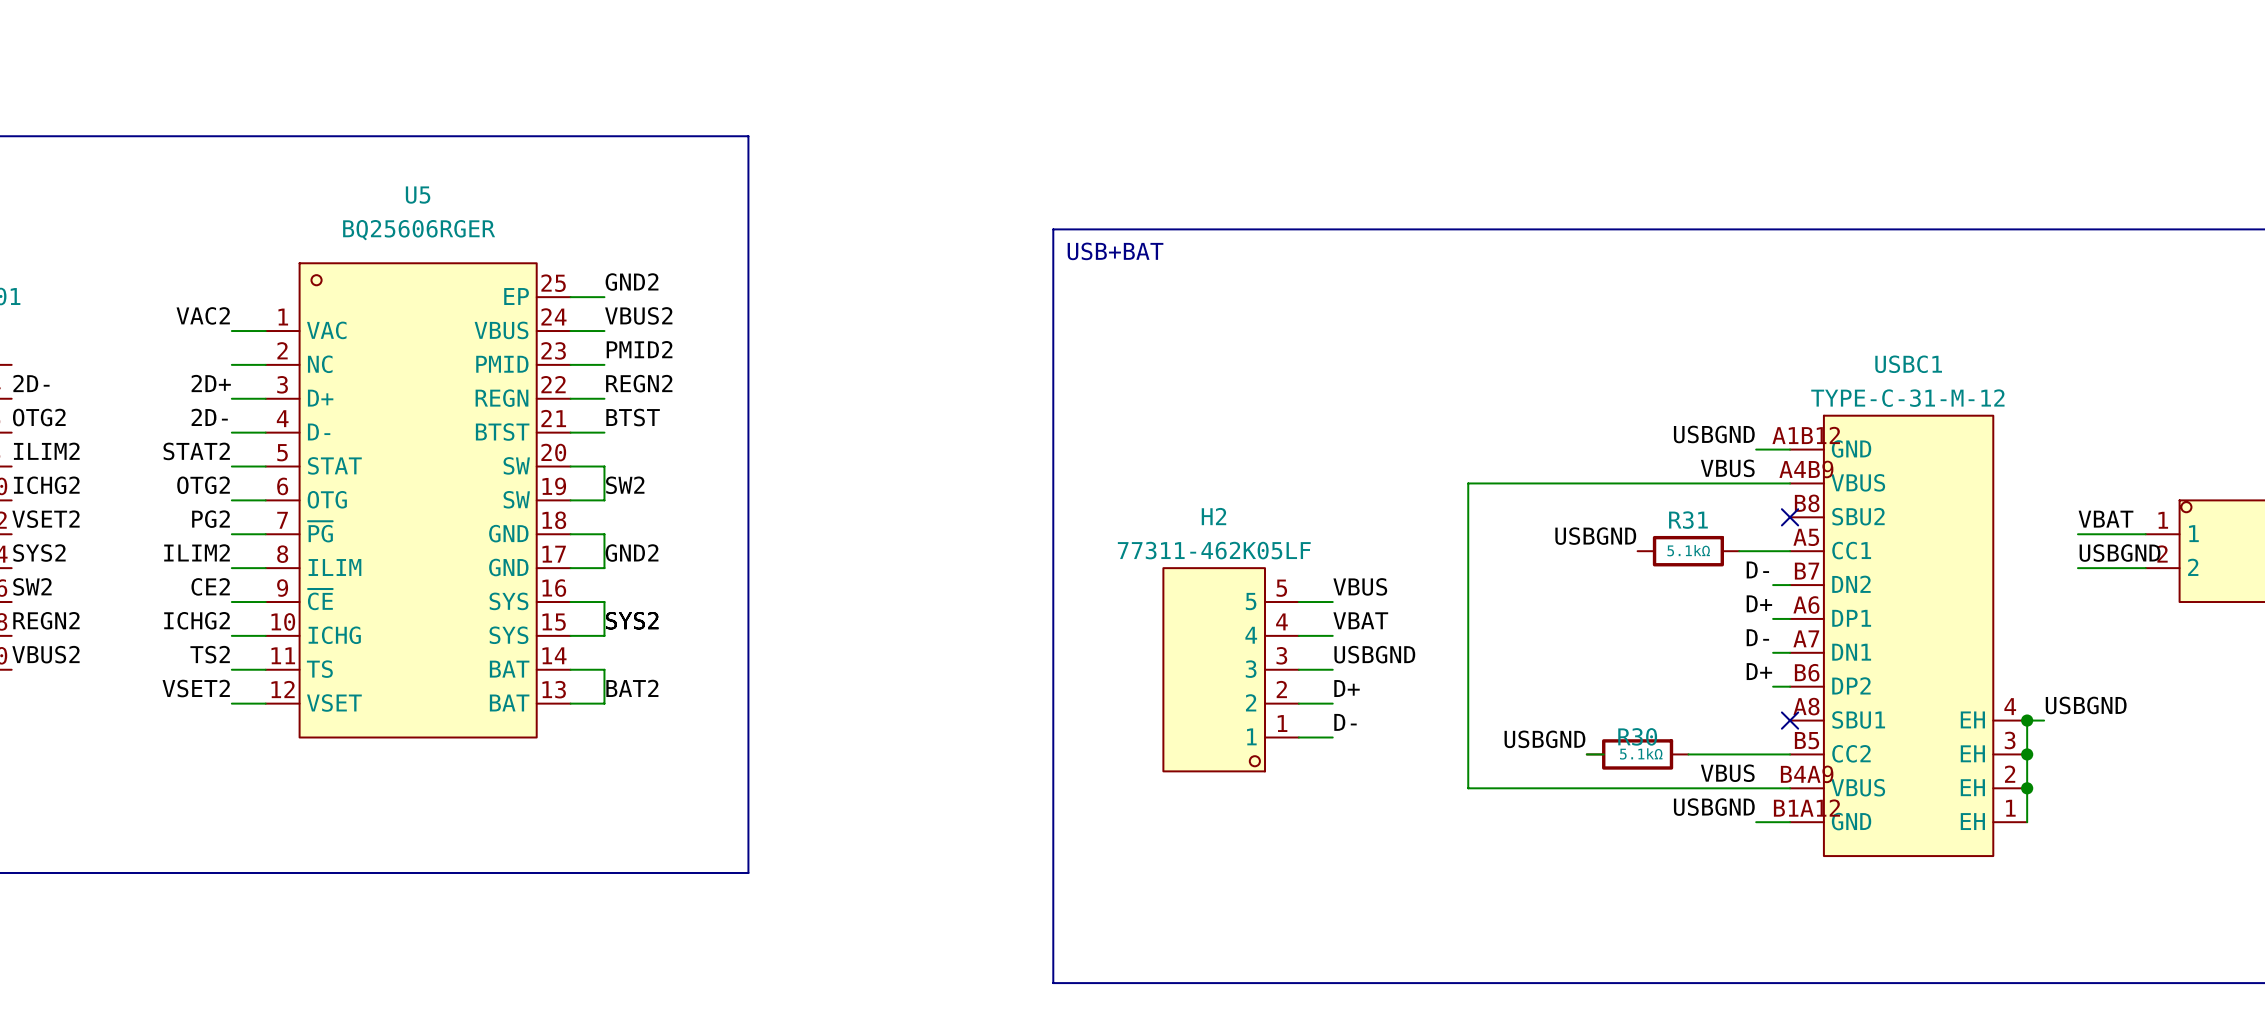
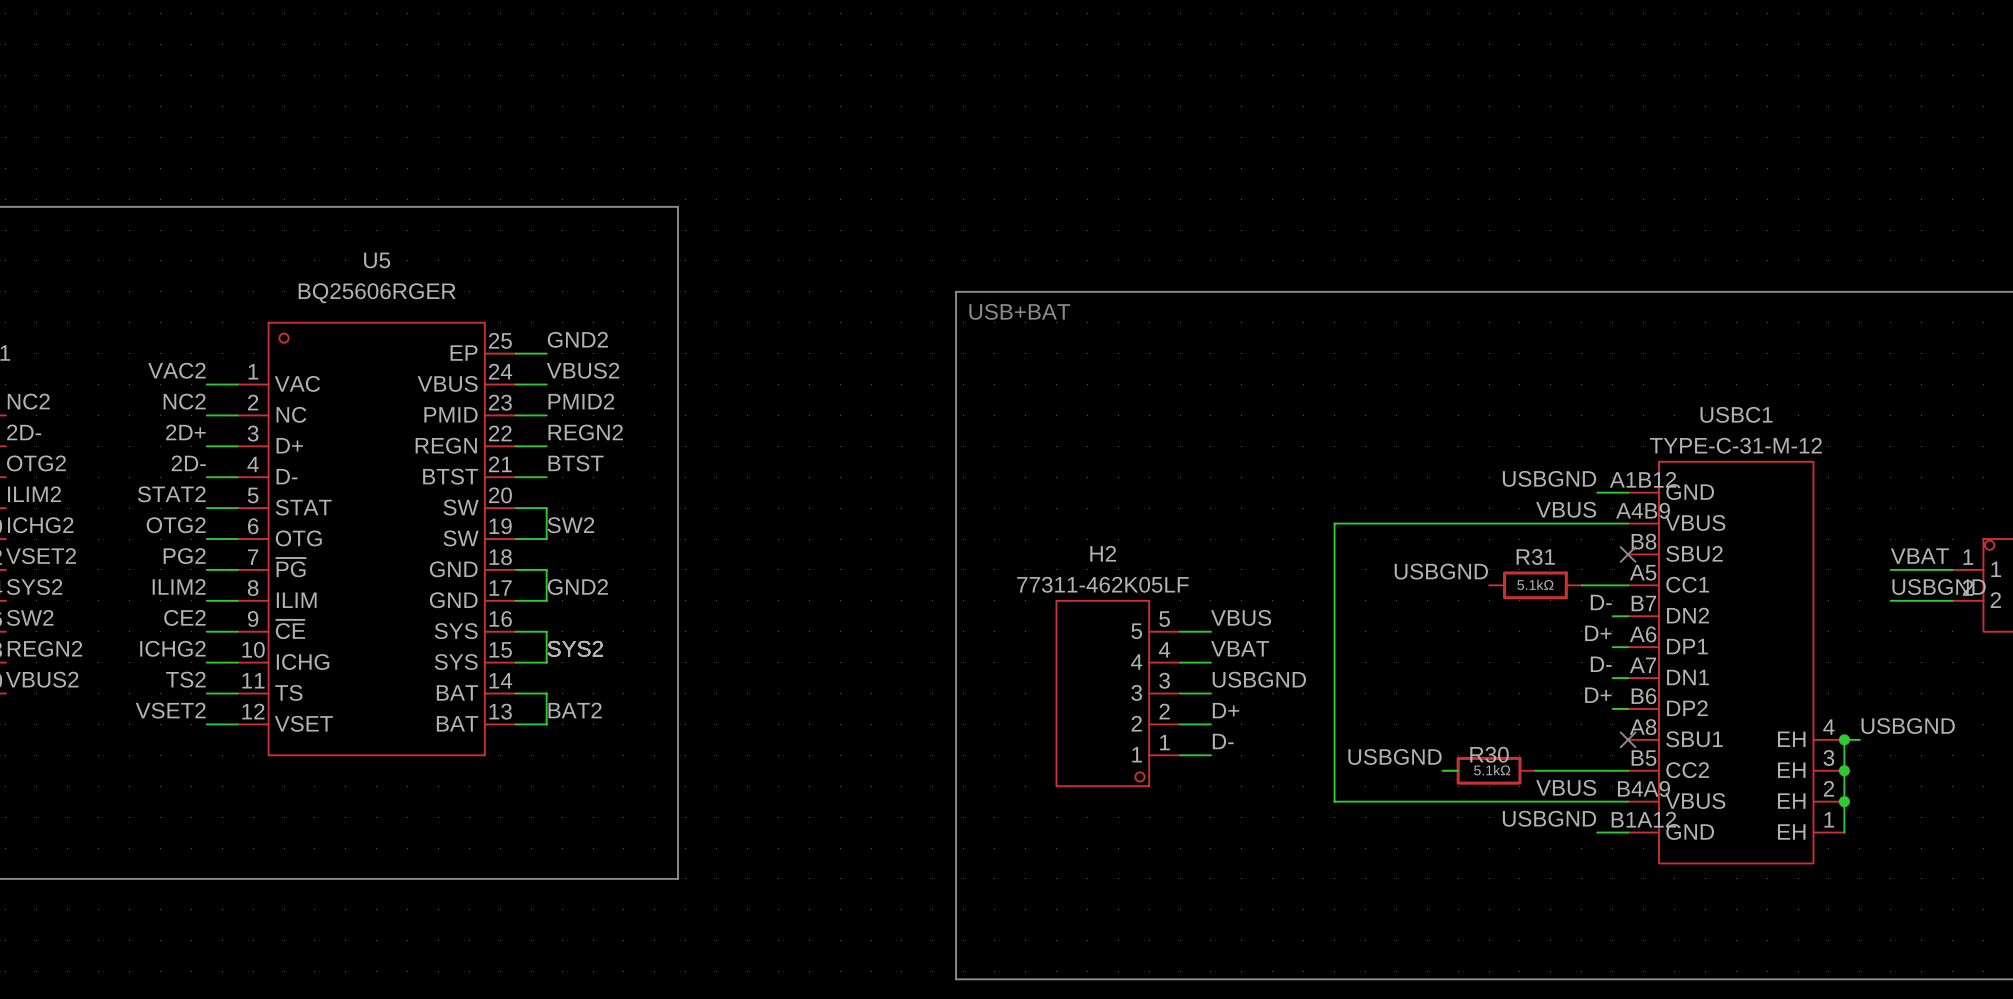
label: none -> NC2 (28, 401)
label: none -> NC2 (184, 401)

